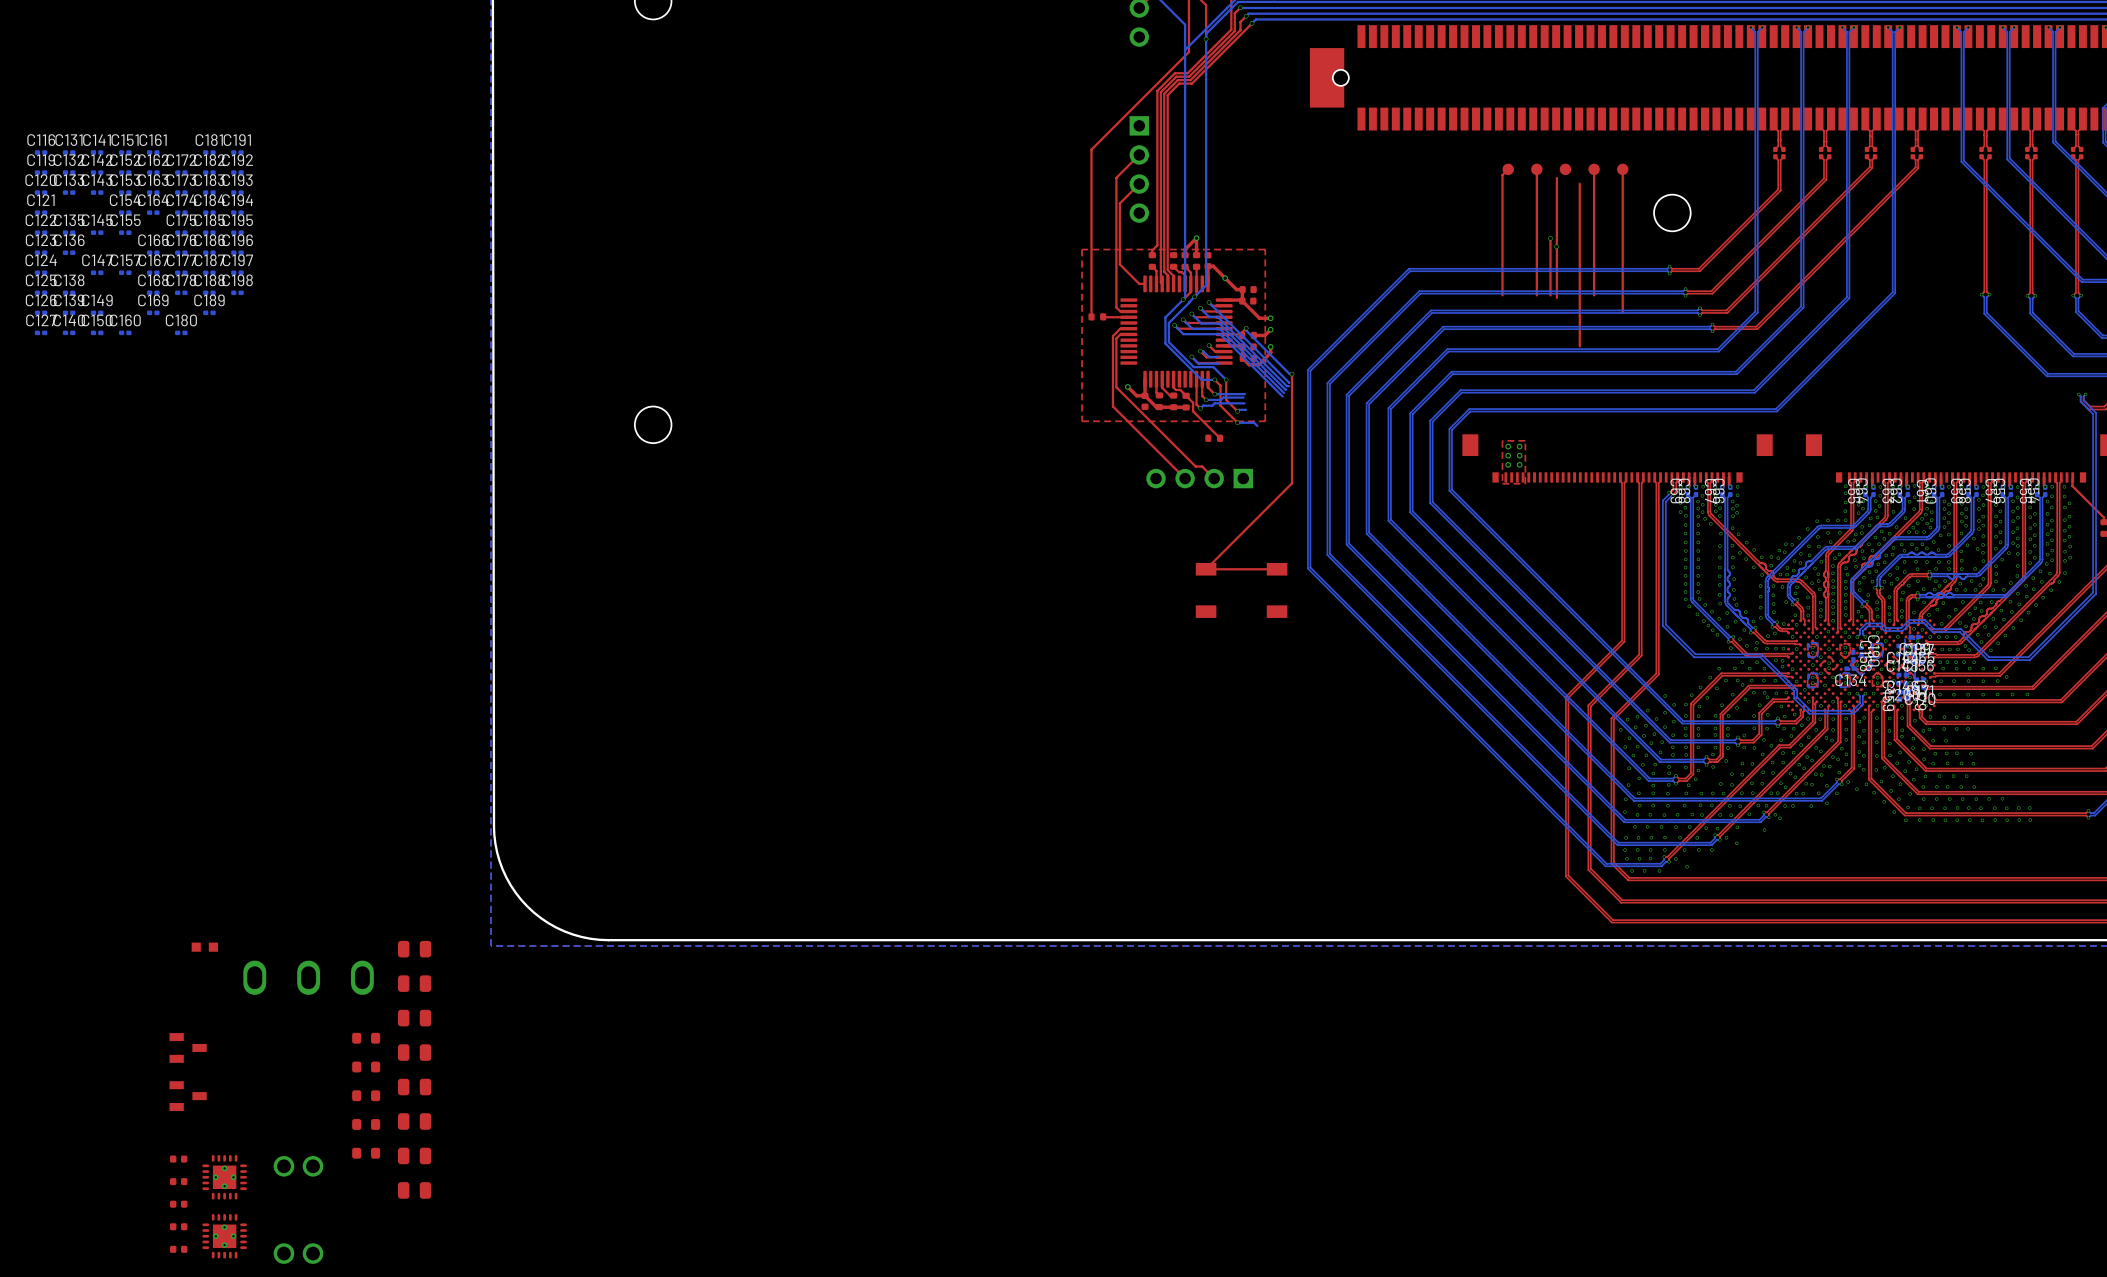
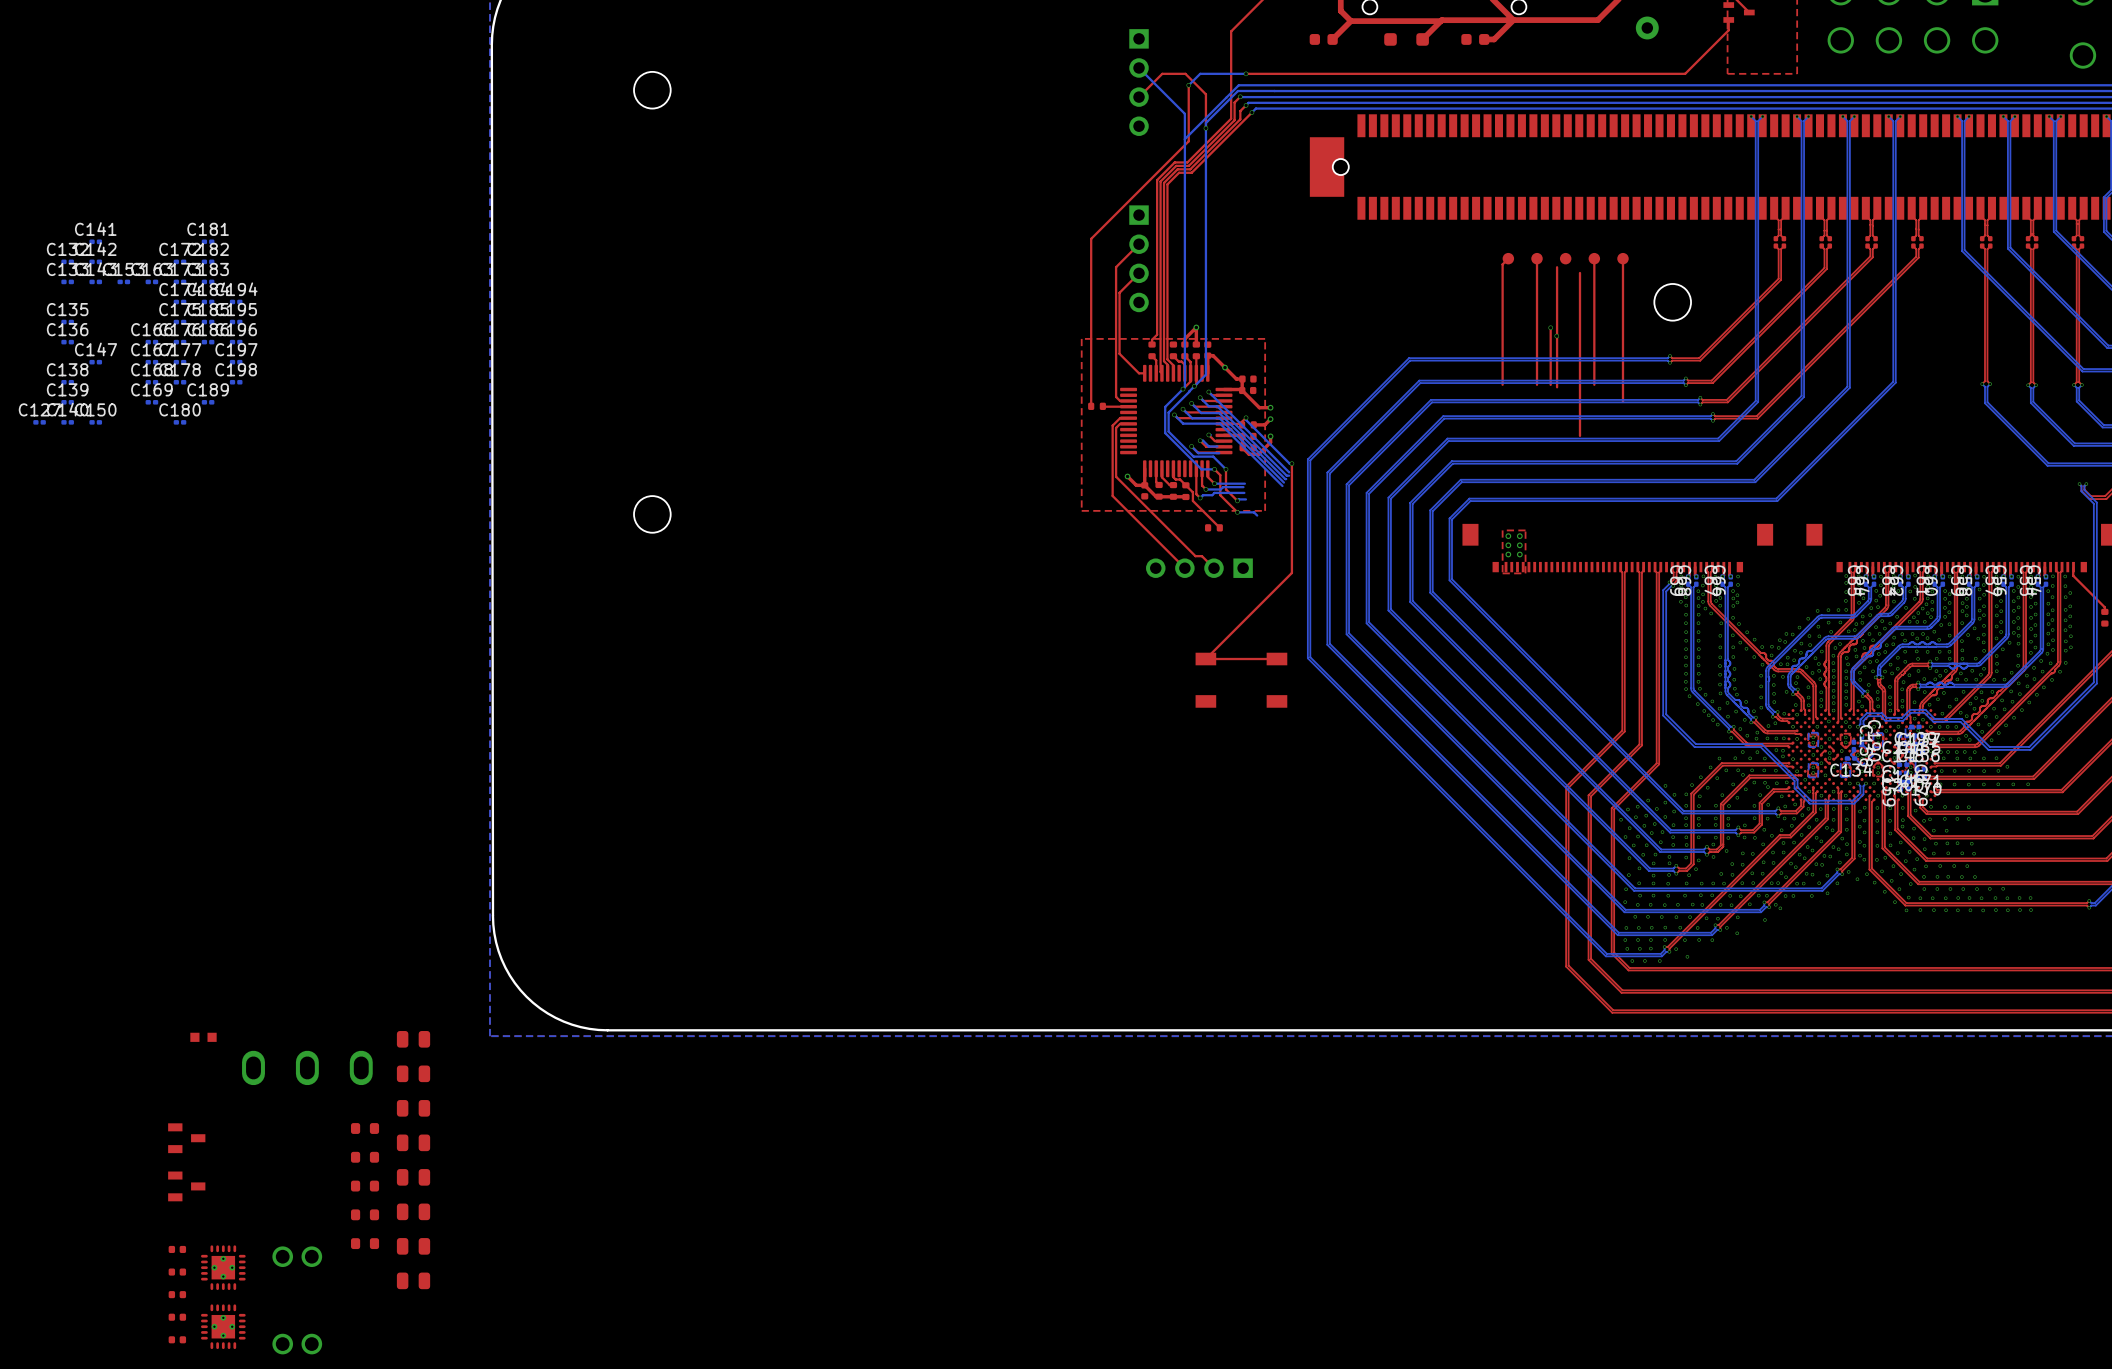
C116: (41, 152) -> none
C131: (69, 152) -> none
C151: (125, 152) -> none
C161: (153, 152) -> none
C191: (237, 152) -> none
C119: (41, 172) -> none
C152: (125, 172) -> none
C162: (153, 172) -> none
C192: (237, 172) -> none
C120: (41, 192) -> none
C193: (237, 192) -> none
C121: (41, 212) -> none
C154: (125, 212) -> none
C164: (153, 212) -> none
C122: (41, 232) -> none
C145: (97, 232) -> none
C155: (125, 232) -> none
C123: (41, 252) -> none
C124: (41, 272) -> none
C157: (125, 272) -> none
C187: (209, 272) -> none
C125: (41, 292) -> none
C188: (209, 292) -> none
C126: (41, 312) -> none
C149: (97, 312) -> none
C160: (125, 332) -> none

